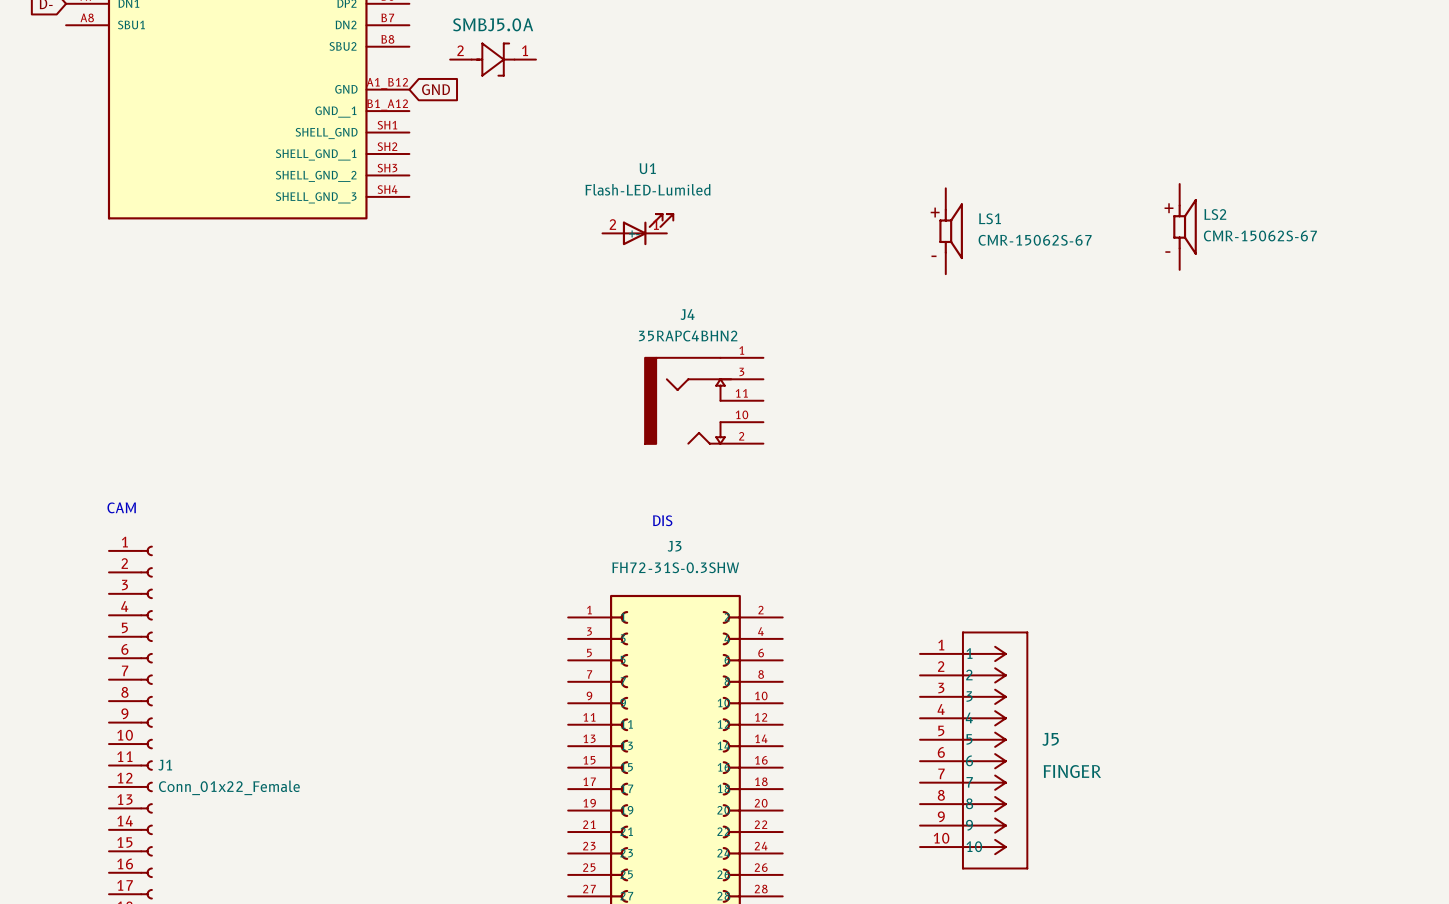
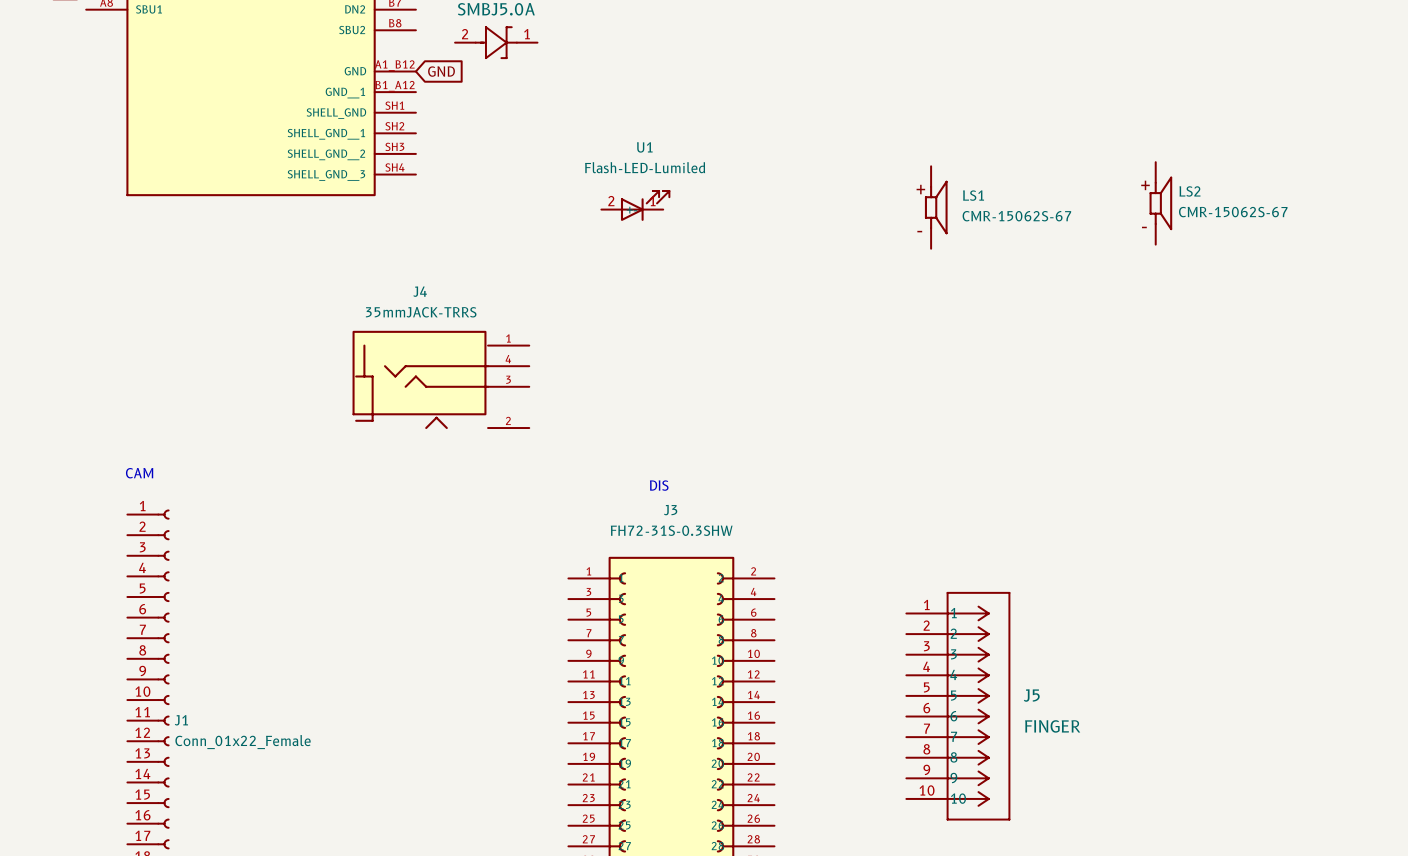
J4 value: 35RAPC4BHN2 (688, 336) -> 35mmJACK-TRRS (421, 312)
J4 symbol: [644, 357, 764, 445] -> [352, 330, 530, 430]

